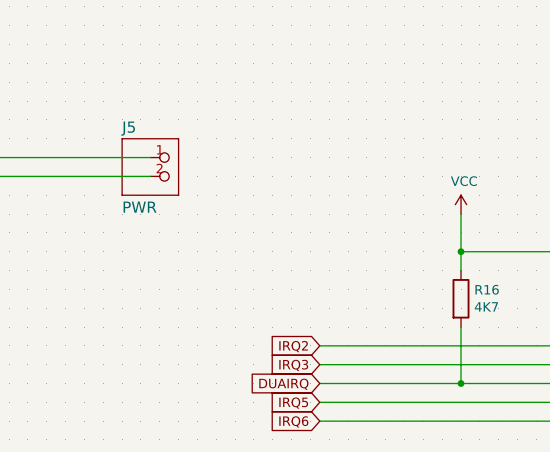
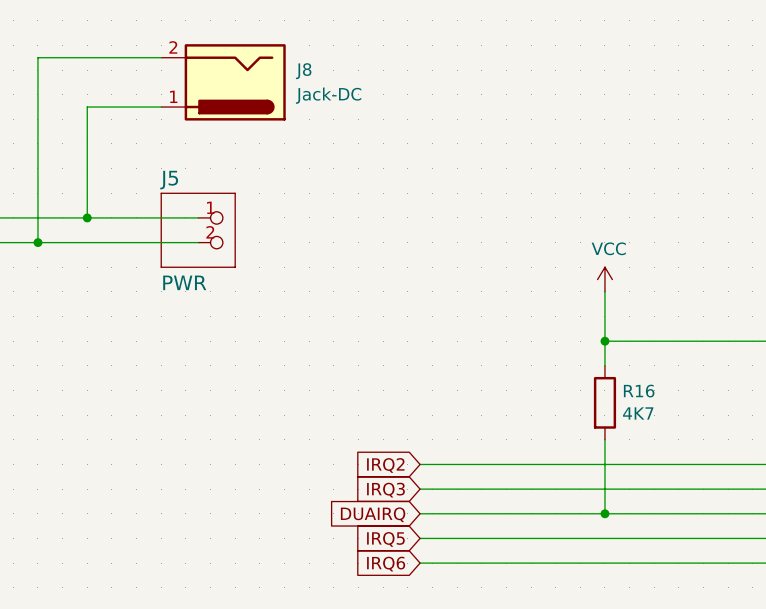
wire: none -> (161, 57) (37, 57) (37, 242)
J8: none -> Jack-DC (223, 82)
wire: none -> (161, 107) (87, 107) (87, 217)
junction: none -> (87, 217)
junction: none -> (37, 242)

